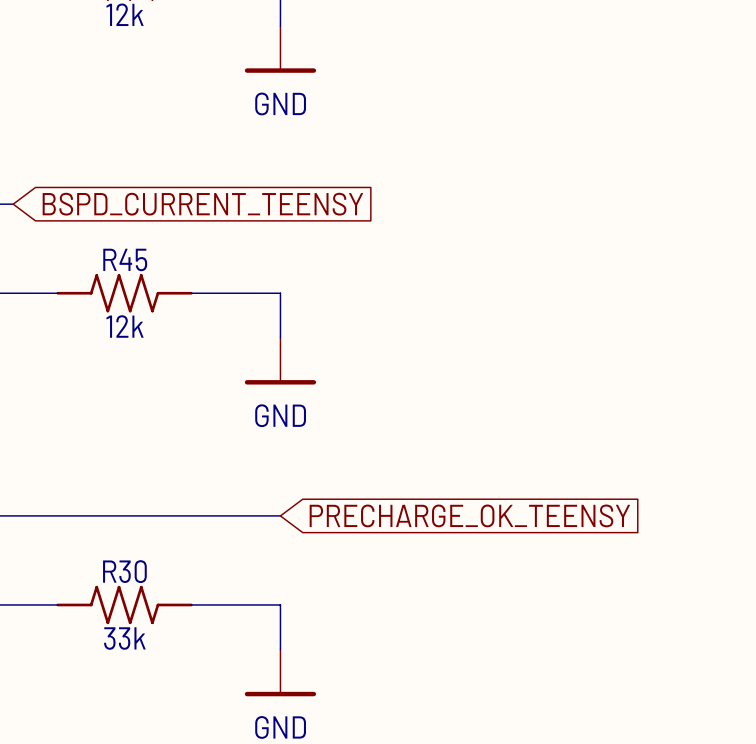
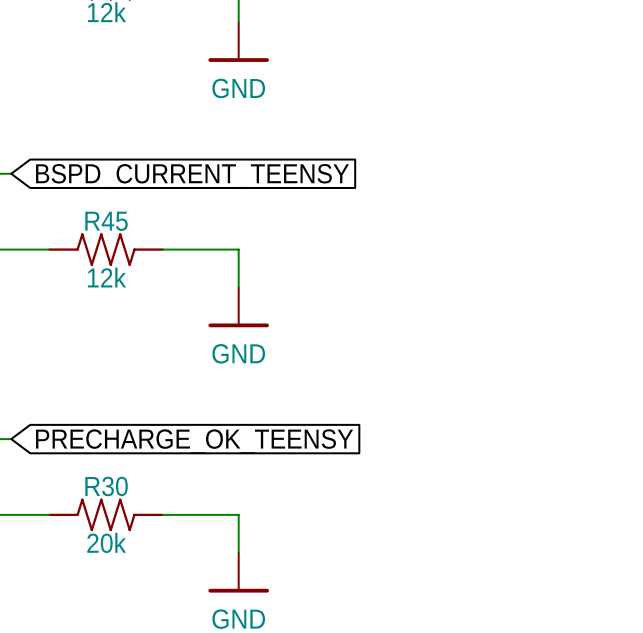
wire: (13, 515) (280, 515) -> none
global label position: PRECHARGE_OK_TEENSY (469, 515) -> PRECHARGE_OK_TEENSY (194, 441)
R30 text: 33k (124, 638) -> 20k (106, 542)

